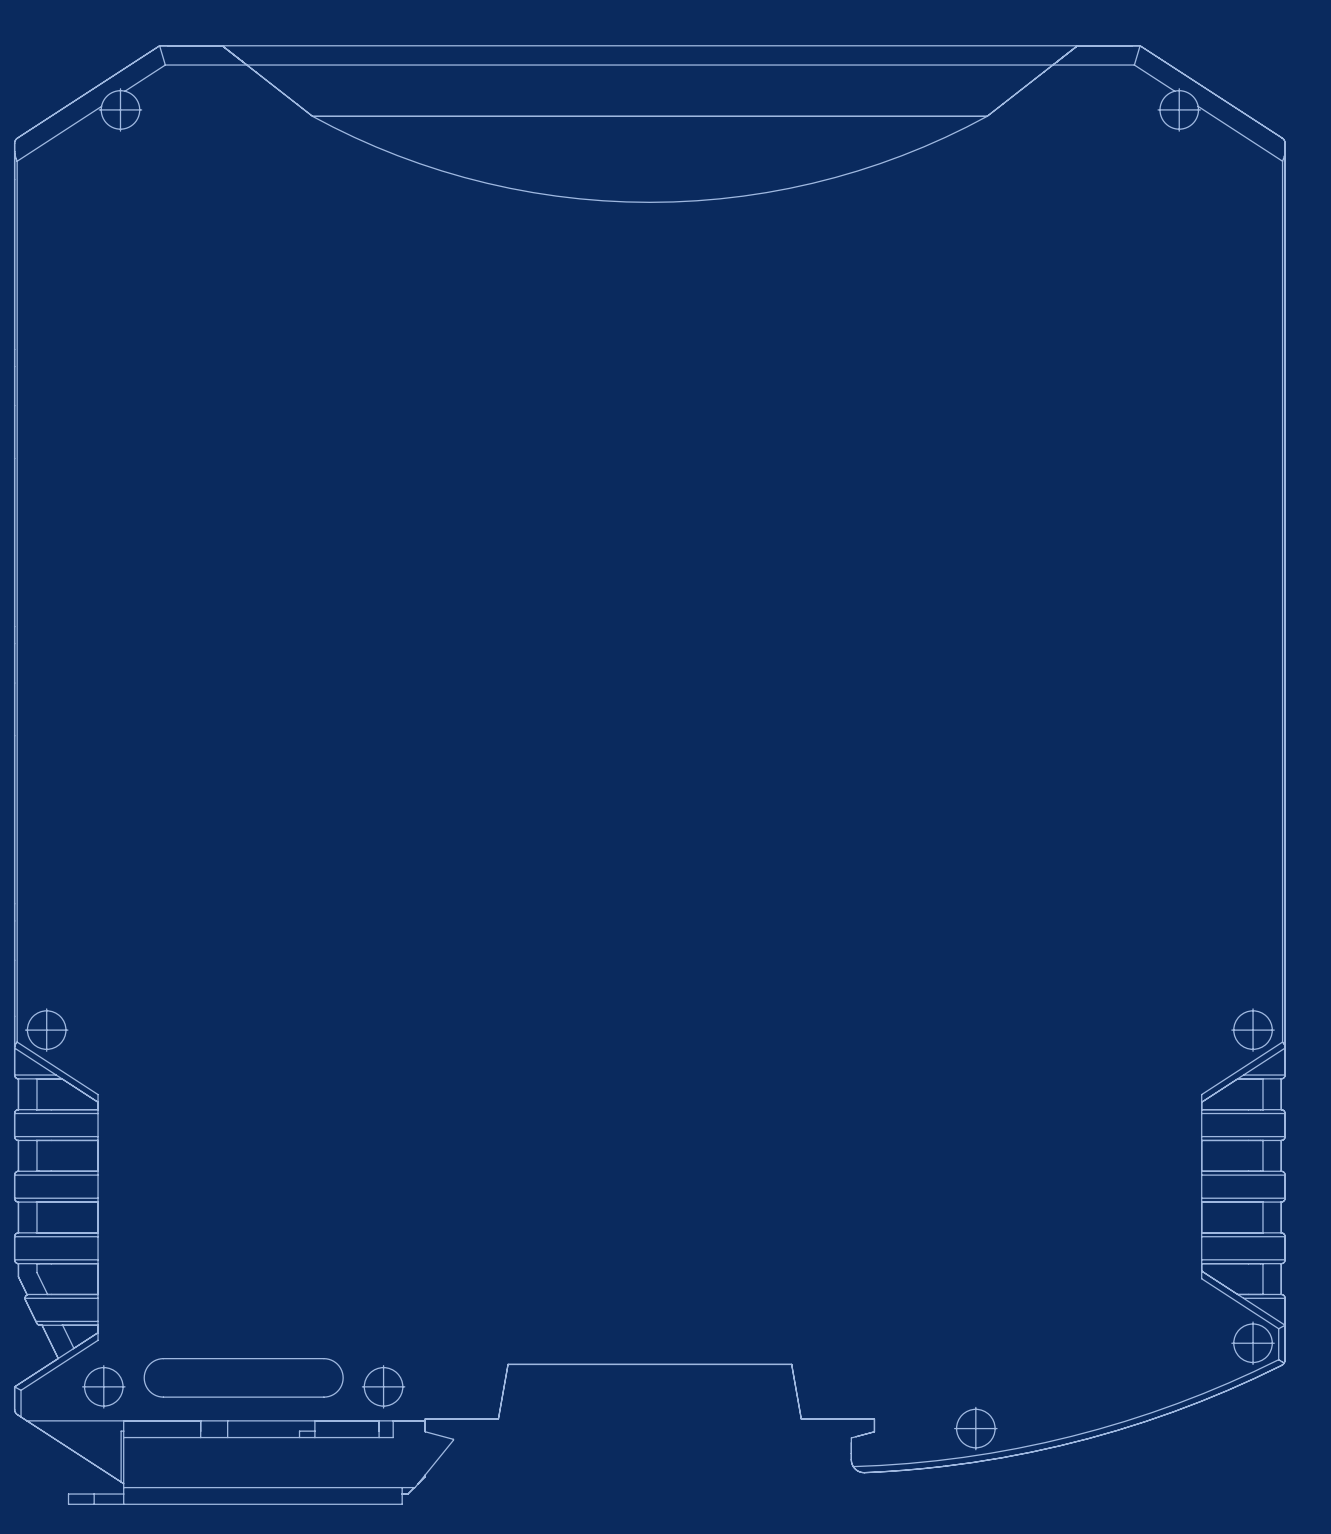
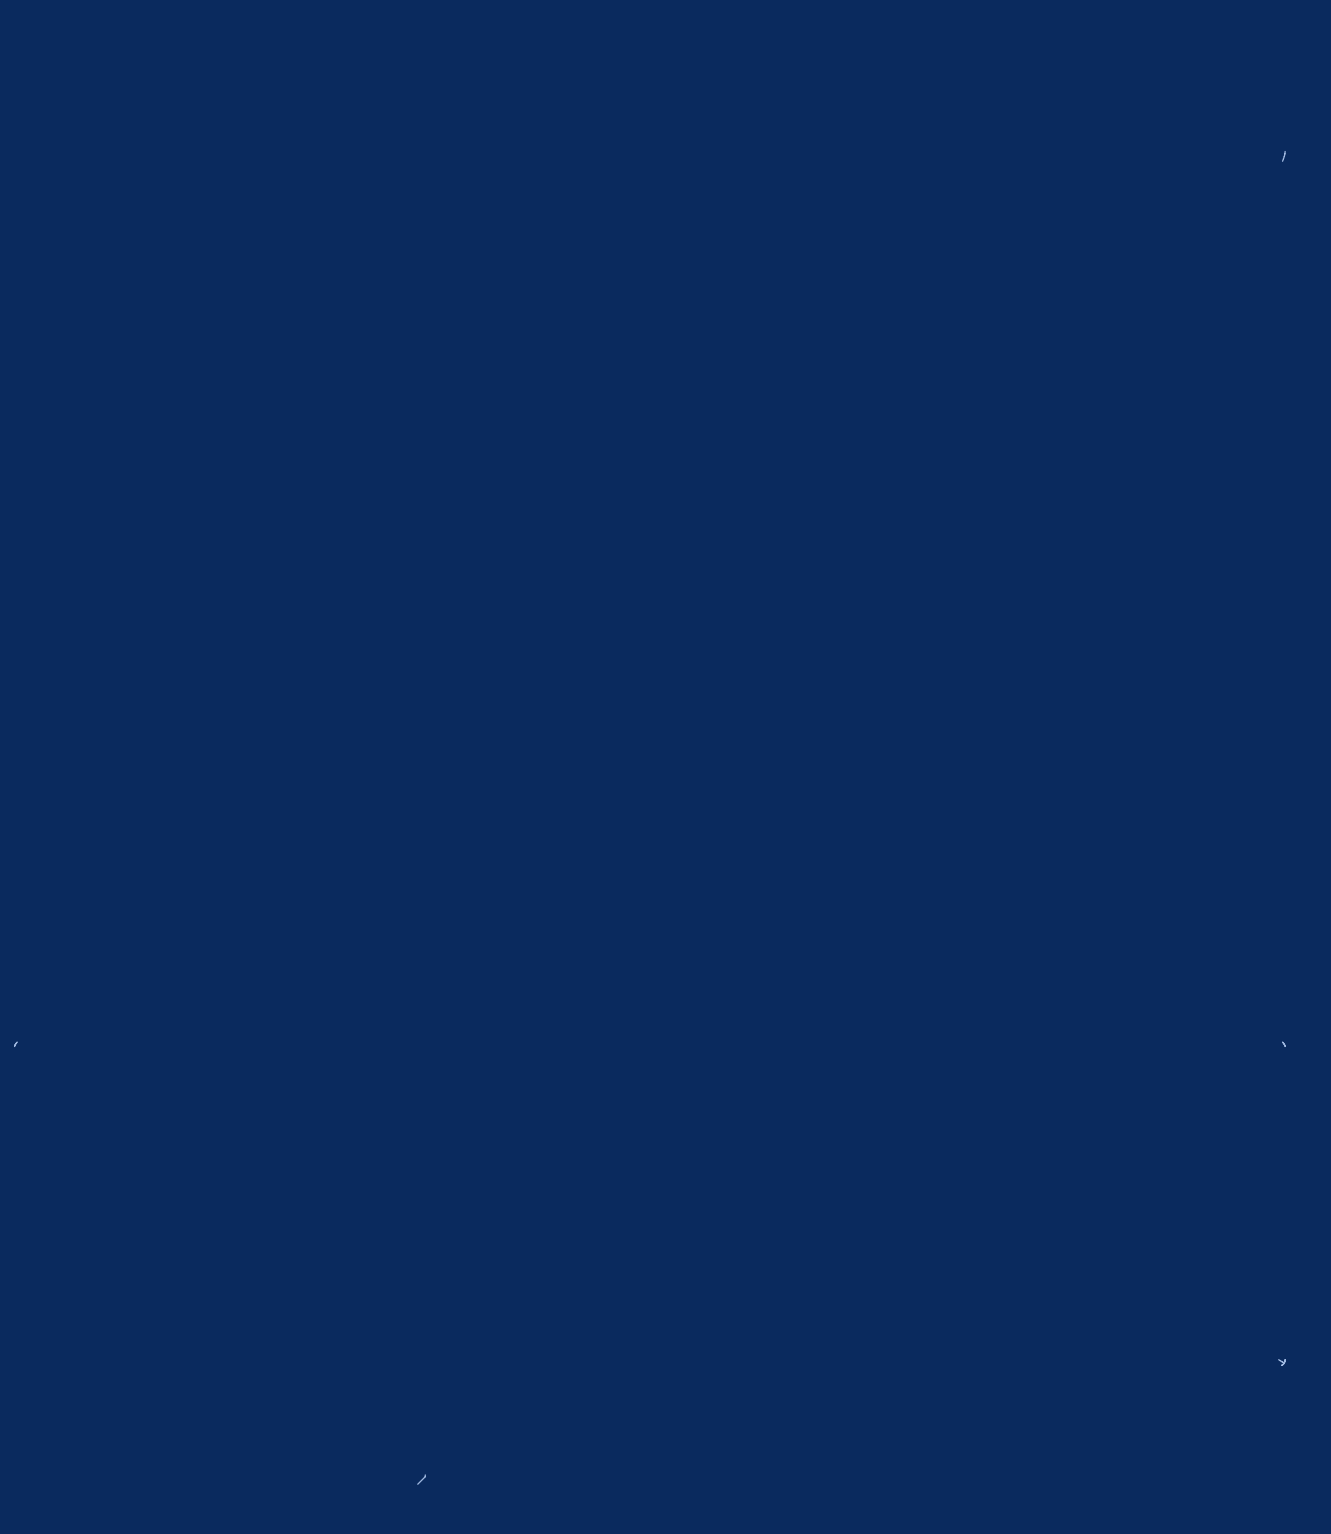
line: (159, 45) (165, 65) -> none
line: (159, 45) (1140, 45) -> none
line: (159, 45) (17, 138) -> none
line: (222, 45) (312, 116) -> none
line: (1077, 45) (987, 116) -> none
line: (1140, 45) (1134, 65) -> none
line: (1140, 45) (1282, 138) -> none
line: (165, 65) (1134, 65) -> none
line: (165, 65) (124, 91) -> none
line: (1134, 65) (1174, 91) -> none
line: (120, 88) (120, 131) -> none
line: (1179, 88) (1179, 131) -> none
line: (124, 91) (133, 95) (139, 106) (138, 116) (130, 126) (119, 129) (109, 125) (102, 116) (101, 106) -> none
line: (124, 91) (118, 90) (110, 93) (103, 100) (101, 106) -> none
line: (1174, 91) (1181, 90) (1189, 93) (1195, 100) (1198, 106) -> none
line: (1174, 91) (1164, 97) (1160, 106) (1161, 116) (1168, 126) (1178, 129) (1189, 125) (1197, 116) (1198, 106) -> none
line: (101, 106) (17, 161) -> none
line: (1198, 106) (1282, 161) (1282, 1042) (1201, 1094) (1201, 1278) (1278, 1328) -> none
line: (99, 109) (141, 109) -> none
line: (1158, 109) (1200, 109) -> none
line: (312, 116) (987, 116) -> none
line: (312, 116) (375, 146) (419, 163) (464, 177) (510, 188) (556, 196) (603, 200) (649, 202) (696, 200) (743, 196) (812, 183) (857, 170) (902, 155) (945, 137) (987, 116) -> none
line: (17, 138) (14, 143) -> none
line: (17, 138) (14, 143) -> none
line: (1282, 138) (1285, 143) -> none
line: (1282, 138) (1285, 143) -> none
line: (14, 143) (14, 1075) -> none
line: (1285, 143) (1285, 1075) -> none
line: (14, 151) (17, 161) -> none
line: (17, 161) (17, 1042) (98, 1094) (98, 1340) (21, 1390) -> none
line: (46, 1008) (46, 1051) -> none
line: (1253, 1008) (1253, 1051) -> none
drawing: [26, 1010, 67, 1050] -> none
drawing: [1233, 1010, 1273, 1050] -> none
line: (25, 1030) (67, 1030) -> none
line: (1231, 1030) (1274, 1030) -> none
line: (14, 1048) (98, 1102) -> none
line: (1285, 1048) (1201, 1102) -> none
line: (14, 1075) (56, 1075) -> none
line: (14, 1075) (18, 1078) -> none
line: (14, 1075) (18, 1078) -> none
line: (1243, 1075) (1285, 1075) -> none
line: (1285, 1075) (1281, 1078) -> none
line: (1285, 1075) (1281, 1078) -> none
line: (18, 1078) (62, 1078) -> none
line: (18, 1078) (18, 1109) -> none
line: (36, 1078) (36, 1109) -> none
line: (1237, 1078) (1281, 1078) -> none
line: (1262, 1078) (1262, 1109) -> none
line: (1281, 1078) (1281, 1109) -> none
line: (18, 1109) (98, 1109) -> none
line: (18, 1109) (14, 1113) -> none
line: (18, 1109) (14, 1113) -> none
line: (1201, 1109) (1281, 1109) -> none
line: (1281, 1109) (1285, 1113) -> none
line: (1281, 1109) (1285, 1113) -> none
line: (14, 1113) (14, 1136) -> none
line: (14, 1113) (98, 1113) -> none
line: (1201, 1113) (1285, 1113) -> none
line: (1285, 1113) (1285, 1136) -> none
line: (14, 1136) (98, 1136) -> none
line: (14, 1136) (18, 1140) -> none
line: (14, 1136) (18, 1140) -> none
line: (1201, 1136) (1285, 1136) -> none
line: (1285, 1136) (1281, 1140) -> none
line: (1285, 1136) (1281, 1140) -> none
line: (18, 1140) (18, 1171) -> none
line: (18, 1140) (98, 1140) -> none
line: (36, 1140) (36, 1171) -> none
line: (1201, 1140) (1281, 1140) -> none
line: (1262, 1140) (1262, 1171) -> none
line: (1281, 1140) (1281, 1171) -> none
line: (18, 1171) (98, 1171) -> none
line: (18, 1171) (14, 1175) -> none
line: (18, 1171) (14, 1175) -> none
line: (1201, 1171) (1281, 1171) -> none
line: (1281, 1171) (1285, 1175) -> none
line: (1281, 1171) (1285, 1175) -> none
line: (14, 1175) (14, 1198) -> none
line: (14, 1175) (98, 1175) -> none
line: (1201, 1175) (1285, 1175) -> none
line: (1285, 1175) (1285, 1198) -> none
line: (14, 1198) (98, 1198) -> none
line: (14, 1198) (18, 1202) -> none
line: (14, 1198) (18, 1202) -> none
line: (1201, 1198) (1285, 1198) -> none
line: (1285, 1198) (1281, 1202) -> none
line: (1285, 1198) (1281, 1202) -> none
line: (18, 1202) (18, 1232) -> none
line: (18, 1202) (98, 1202) -> none
line: (36, 1202) (36, 1232) -> none
line: (1201, 1202) (1281, 1202) -> none
line: (1262, 1202) (1262, 1232) -> none
line: (1281, 1202) (1281, 1232) -> none
line: (18, 1232) (98, 1232) -> none
line: (18, 1232) (14, 1236) -> none
line: (18, 1232) (14, 1236) -> none
line: (1201, 1232) (1281, 1232) -> none
line: (1281, 1232) (1285, 1236) -> none
line: (1281, 1232) (1285, 1236) -> none
line: (14, 1236) (98, 1236) -> none
line: (14, 1236) (14, 1259) -> none
line: (1201, 1236) (1285, 1236) -> none
line: (1285, 1236) (1285, 1259) -> none
line: (14, 1259) (98, 1259) -> none
line: (14, 1259) (18, 1263) -> none
line: (14, 1259) (18, 1263) -> none
line: (1201, 1259) (1285, 1259) -> none
line: (1285, 1259) (1281, 1263) -> none
line: (1285, 1259) (1281, 1263) -> none
line: (18, 1263) (18, 1276) (27, 1294) -> none
line: (18, 1263) (98, 1263) -> none
line: (36, 1263) (36, 1272) (47, 1294) -> none
line: (1201, 1263) (1281, 1263) -> none
line: (1262, 1263) (1262, 1294) -> none
line: (1281, 1263) (1281, 1294) -> none
line: (1201, 1271) (1285, 1325) (1278, 1328) -> none
line: (27, 1294) (25, 1298) -> none
line: (27, 1294) (25, 1298) -> none
line: (98, 1294) (27, 1294) -> none
line: (1237, 1294) (1281, 1294) -> none
line: (1281, 1294) (1285, 1298) -> none
line: (1281, 1294) (1285, 1298) -> none
line: (25, 1298) (98, 1298) -> none
line: (1243, 1298) (1285, 1298) -> none
line: (1285, 1298) (1285, 1359) -> none
line: (25, 1300) (36, 1323) -> none
line: (35, 1321) (98, 1321) -> none
line: (1253, 1322) (1253, 1364) -> none
line: (36, 1323) (40, 1325) -> none
line: (36, 1323) (40, 1325) -> none
drawing: [1233, 1323, 1273, 1364] -> none
line: (40, 1325) (98, 1325) -> none
line: (42, 1325) (58, 1358) -> none
line: (62, 1325) (73, 1348) -> none
line: (1278, 1328) (1278, 1359) (1203, 1393) (1125, 1421) (1071, 1436) (990, 1453) (935, 1460) (853, 1466) -> none
line: (98, 1332) (73, 1348) -> none
line: (1231, 1343) (1274, 1343) -> none
line: (73, 1348) (14, 1386) -> none
line: (163, 1358) (326, 1358) (339, 1366) (342, 1380) (337, 1391) (326, 1396) (160, 1396) (148, 1389) (144, 1377) (149, 1364) (163, 1358) -> none
line: (103, 1365) (103, 1408) -> none
line: (383, 1365) (383, 1408) -> none
drawing: [83, 1366, 124, 1407] -> none
drawing: [363, 1366, 404, 1407] -> none
line: (14, 1386) (14, 1409) -> none
line: (14, 1386) (21, 1390) -> none
line: (82, 1386) (124, 1386) -> none
line: (362, 1386) (404, 1386) -> none
line: (21, 1390) (21, 1417) -> none
line: (975, 1407) (975, 1449) -> none
drawing: [955, 1408, 996, 1449] -> none
line: (14, 1409) (17, 1414) -> none
line: (14, 1409) (17, 1414) -> none
line: (17, 1414) (123, 1483) -> none
line: (26, 1420) (425, 1420) -> none
line: (123, 1420) (123, 1504) -> none
line: (200, 1420) (200, 1437) -> none
line: (227, 1420) (227, 1437) -> none
line: (314, 1420) (314, 1437) -> none
line: (379, 1420) (379, 1437) -> none
line: (393, 1420) (393, 1437) (123, 1437) -> none
line: (954, 1428) (997, 1428) -> none
line: (123, 1431) (121, 1431) (121, 1482) -> none
line: (314, 1431) (299, 1431) (299, 1437) -> none
line: (851, 1459) (851, 1437) (874, 1431) (874, 1418) (801, 1418) (791, 1364) (508, 1364) (498, 1418) (425, 1418) (425, 1431) (453, 1440) (415, 1487) (123, 1487) -> none
line: (851, 1459) (853, 1466) -> none
line: (851, 1459) (853, 1466) -> none
line: (853, 1466) (858, 1471) (864, 1472) -> none
line: (853, 1466) (858, 1471) (864, 1472) -> none
line: (943, 1466) (1031, 1452) (1117, 1430) (1200, 1401) (1281, 1365) (1228, 1390) (1200, 1401) (1173, 1412) (1117, 1430) (1059, 1445) (1031, 1452) (1002, 1457) (943, 1466) -> none
line: (943, 1466) (864, 1472) -> none
line: (943, 1466) (864, 1472) -> none
line: (402, 1487) (402, 1504) (68, 1504) (68, 1494) (123, 1494) -> none
line: (414, 1487) (407, 1494) (402, 1494) -> none
line: (94, 1494) (94, 1504) -> none

